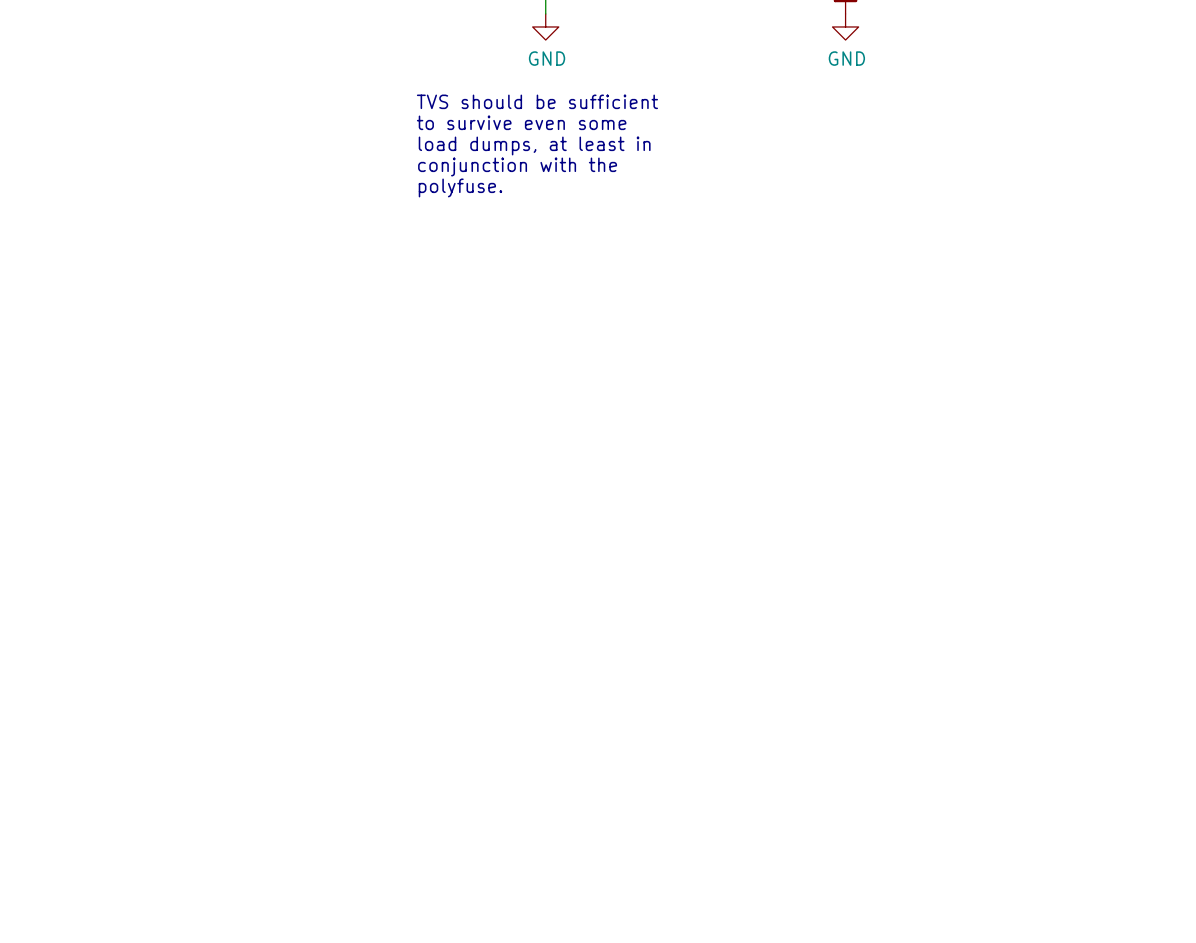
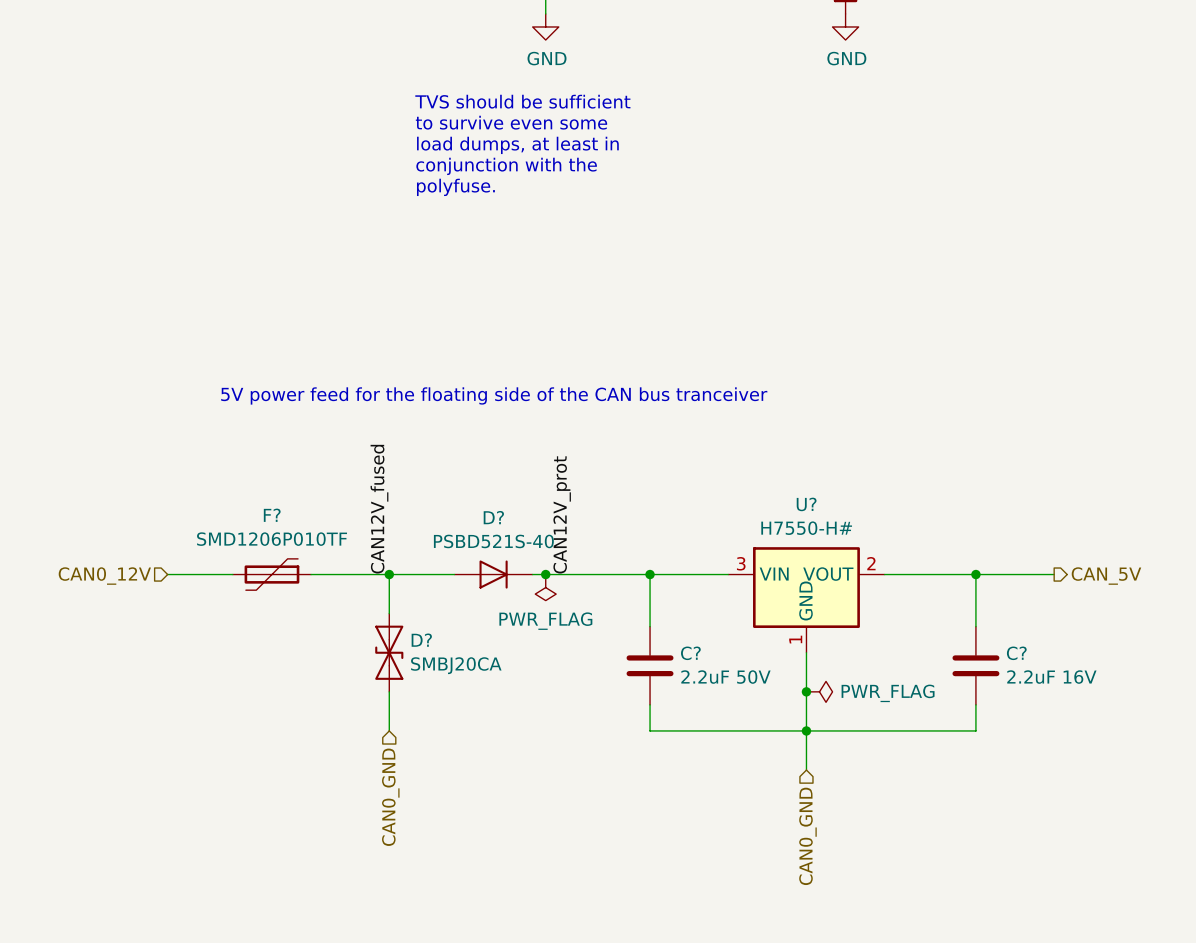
text: none -> 5V power feed for the floating side of the CAN bus tranceiver (494, 395)
label: none -> CAN12V_fused (379, 509)
label: none -> CAN12V_prot (562, 514)
hierarchical label: none -> CAN0_12V (104, 576)
wire: none -> (167, 574) (232, 574)
F?: none -> SMD1206P010TF (271, 574)
wire: none -> (311, 574) (454, 574)
wire: none -> (389, 574) (389, 613)
junction: none -> (389, 574)
D?: none -> PSBD521S-40 (493, 574)
wire: none -> (532, 574) (728, 574)
junction: none -> (545, 574)
wire: none -> (650, 574) (650, 626)
junction: none -> (650, 574)
wire: none -> (884, 574) (1054, 574)
wire: none -> (975, 574) (975, 626)
junction: none -> (975, 574)
hierarchical label: none -> CAN_5V (1106, 576)
power symbol: none -> PWR_FLAG (545, 587)
U?: none -> H7550-H# (806, 599)
D?: none -> SMBJ20CA (389, 652)
wire: none -> (806, 652) (806, 770)
C?: none -> 2.2uF 50V (650, 665)
C?: none -> 2.2uF 16V (975, 665)
wire: none -> (389, 691) (389, 730)
junction: none -> (806, 691)
power symbol: none -> PWR_FLAG (819, 691)
wire: none -> (650, 704) (650, 730) (975, 730) (975, 704)
junction: none -> (806, 730)
hierarchical label: none -> CAN0_GND (390, 797)
hierarchical label: none -> CAN0_GND (807, 836)

